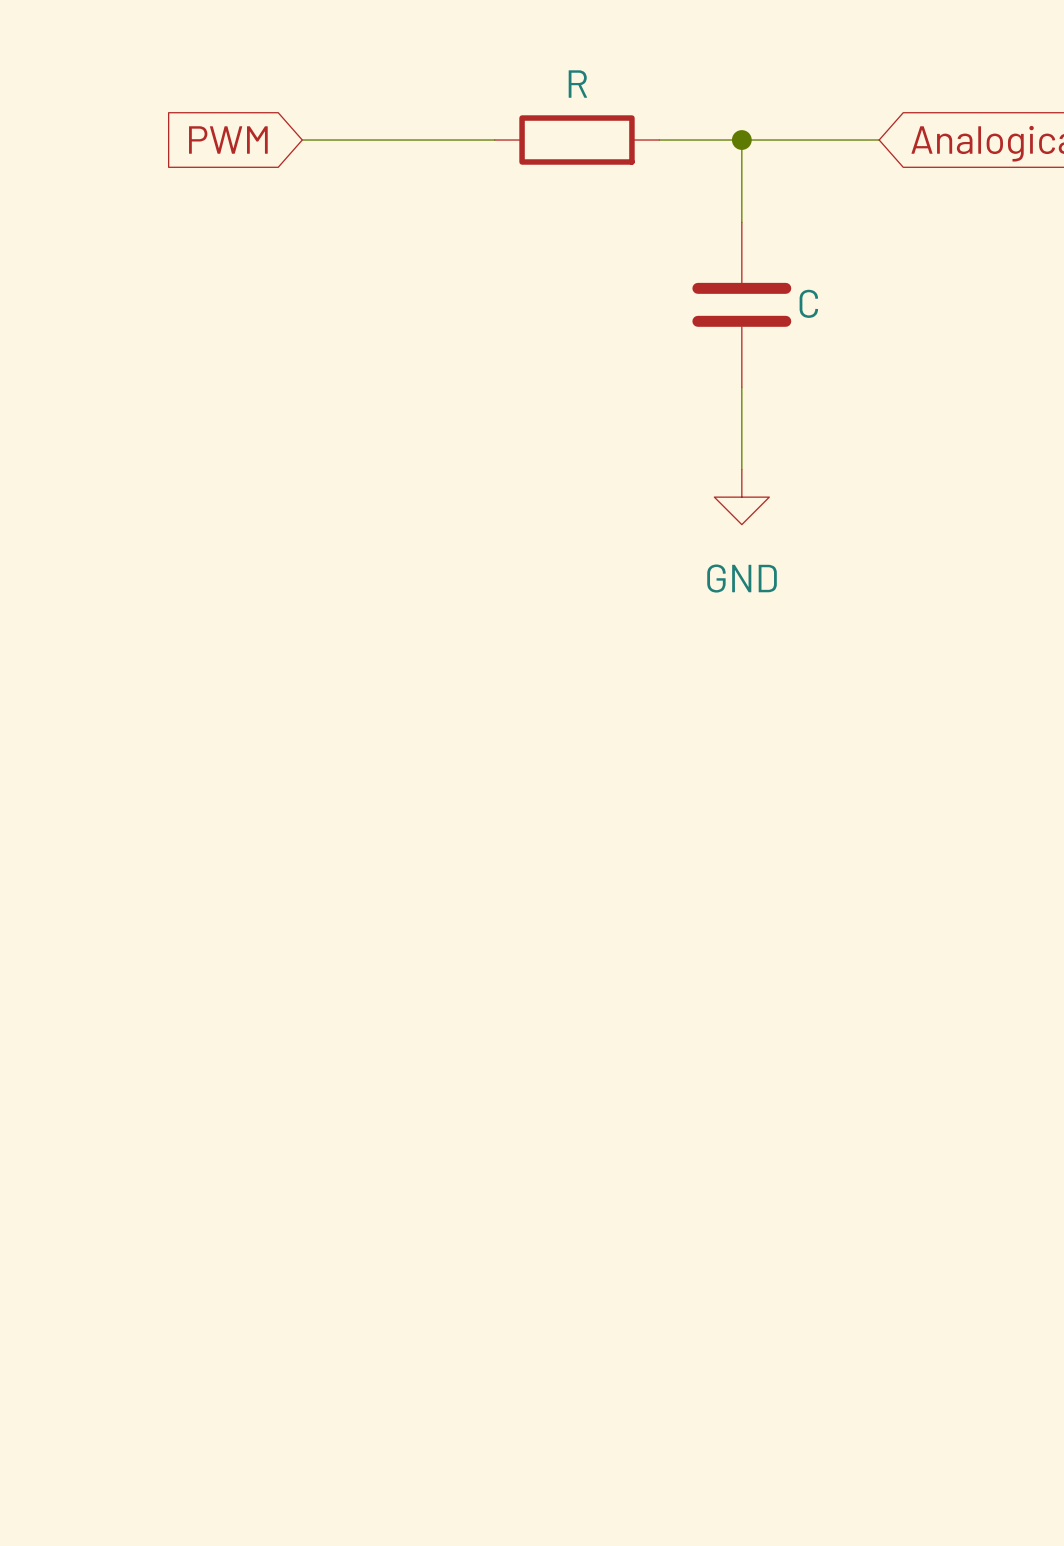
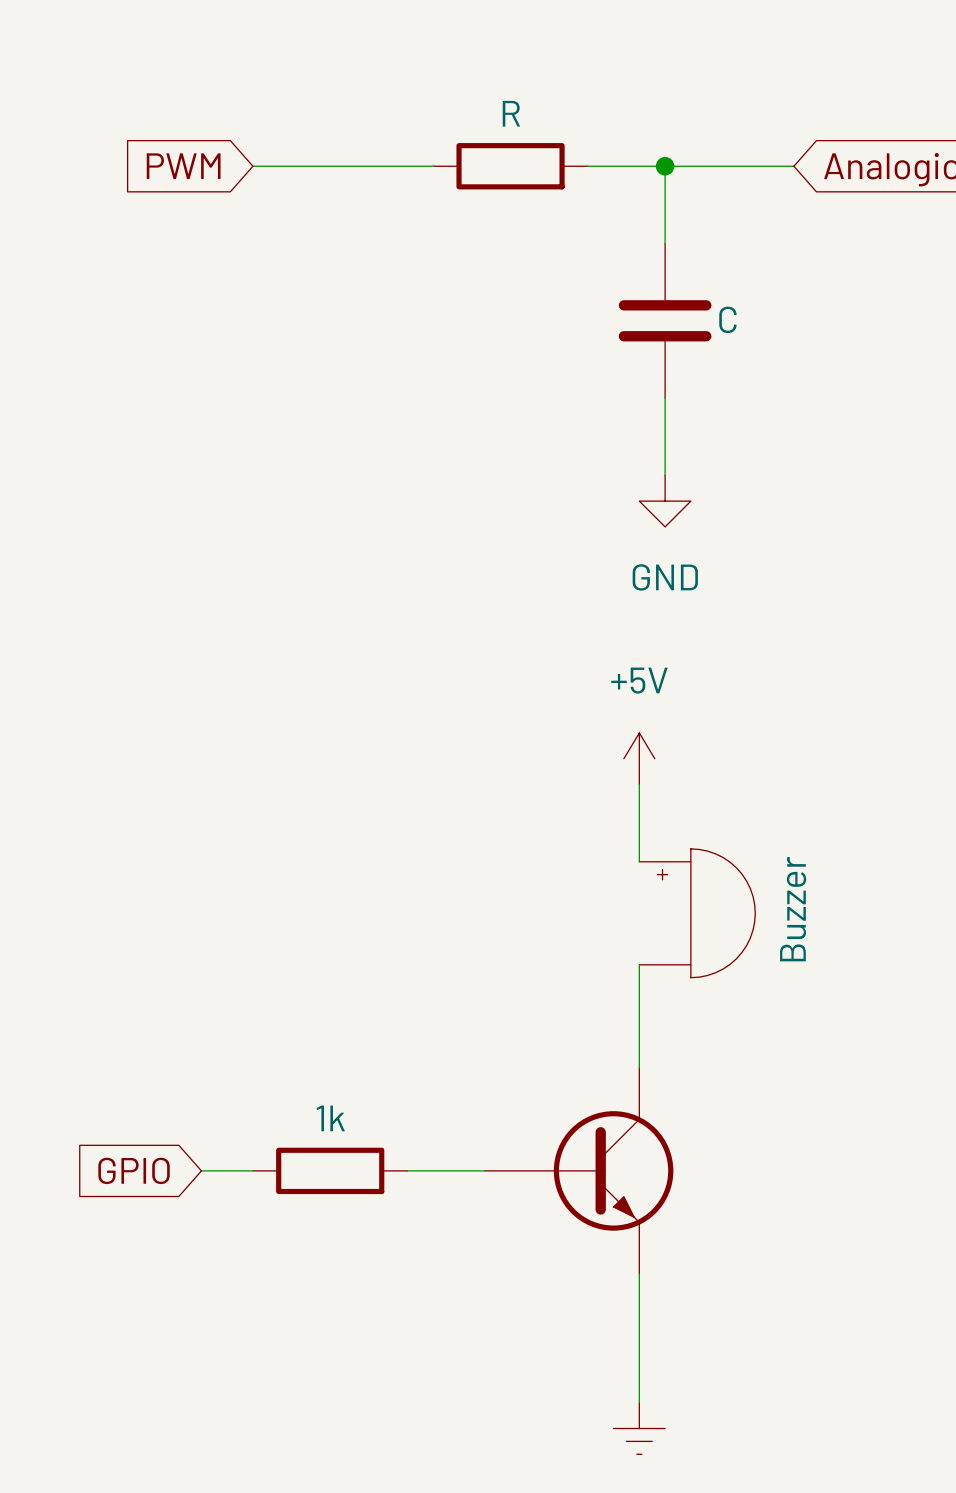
power symbol: none -> +5V (639, 758)
wire: none -> (639, 784) (639, 861)
part: none -> Buzzer (697, 913)
wire: none -> (639, 964) (639, 1067)
global label: none -> GPIO (134, 1170)
wire: none -> (201, 1170) (252, 1170)
part: none -> 1k (330, 1170)
wire: none -> (407, 1170) (484, 1170)
part: none -> (579, 1170)
wire: none -> (639, 1273) (639, 1402)
power symbol: none -> (639, 1428)

